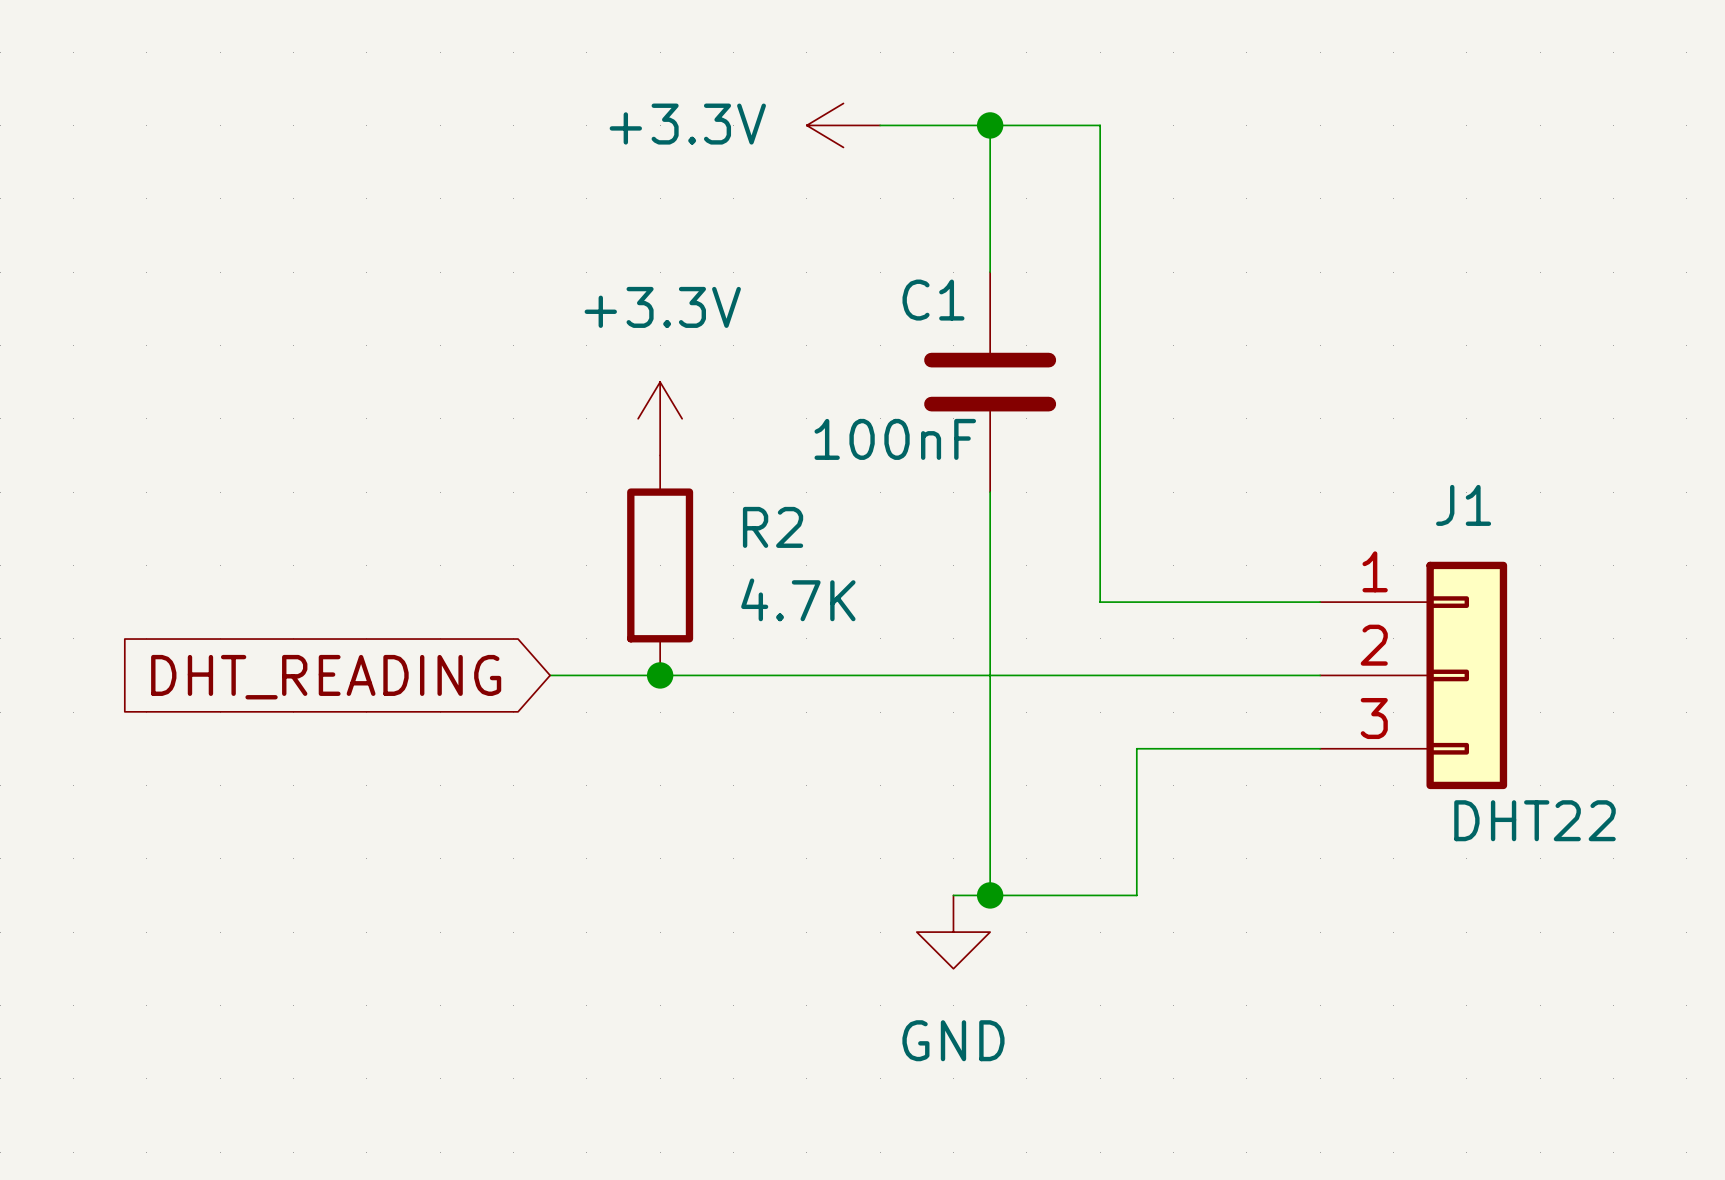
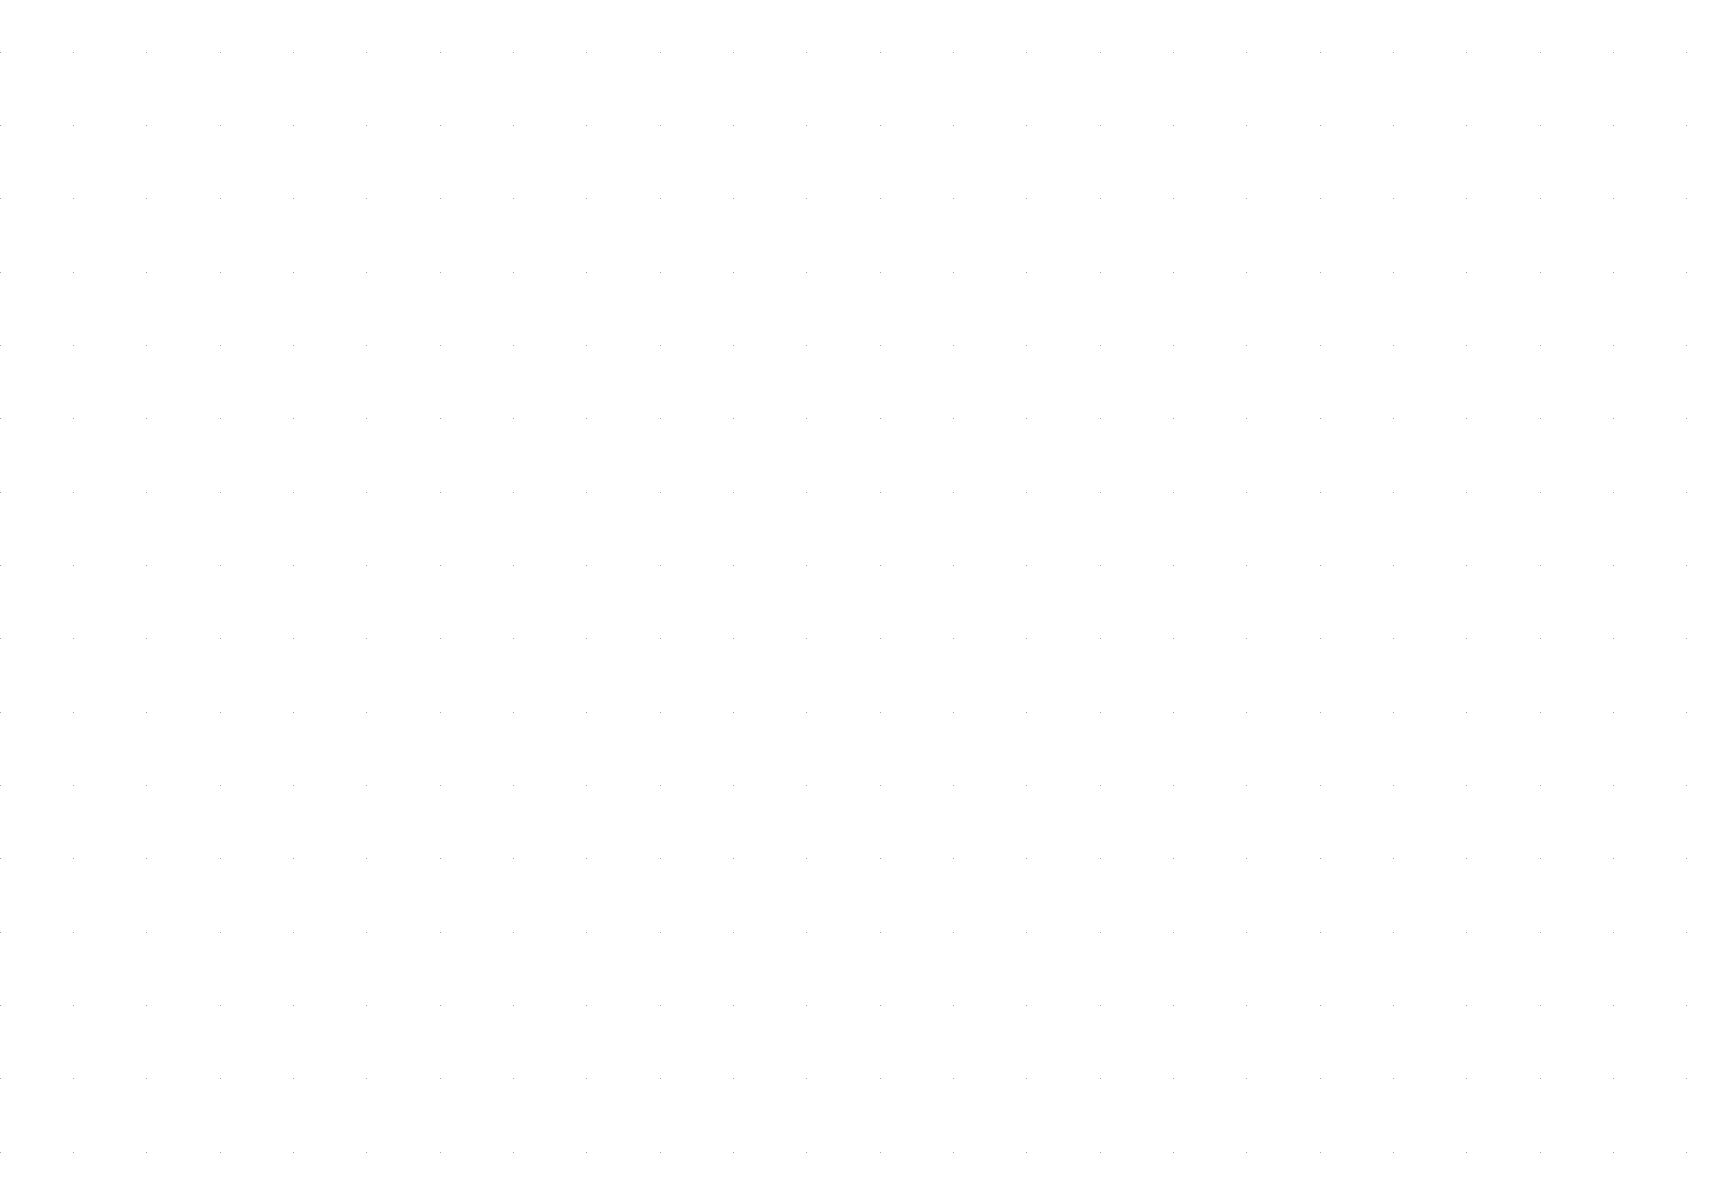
power symbol: +3.3V (843, 125) -> none
wire: (880, 125) (1100, 125) (1100, 602) (1320, 602) -> none
wire: (990, 125) (990, 272) -> none
junction: (990, 125) -> none
C1: 100nF (990, 382) -> none
power symbol: +3.3V (660, 418) -> none
wire: (990, 492) (990, 895) -> none
R2: 4.7K (660, 565) -> none
wire: (550, 675) (1320, 675) -> none
junction: (660, 675) -> none
J1: DHT22 (1413, 675) -> none
global label: DHT_READING (326, 677) -> none
wire: (1320, 748) (1136, 748) (1136, 895) (953, 895) -> none
junction: (990, 895) -> none
power symbol: GND (953, 932) -> none

